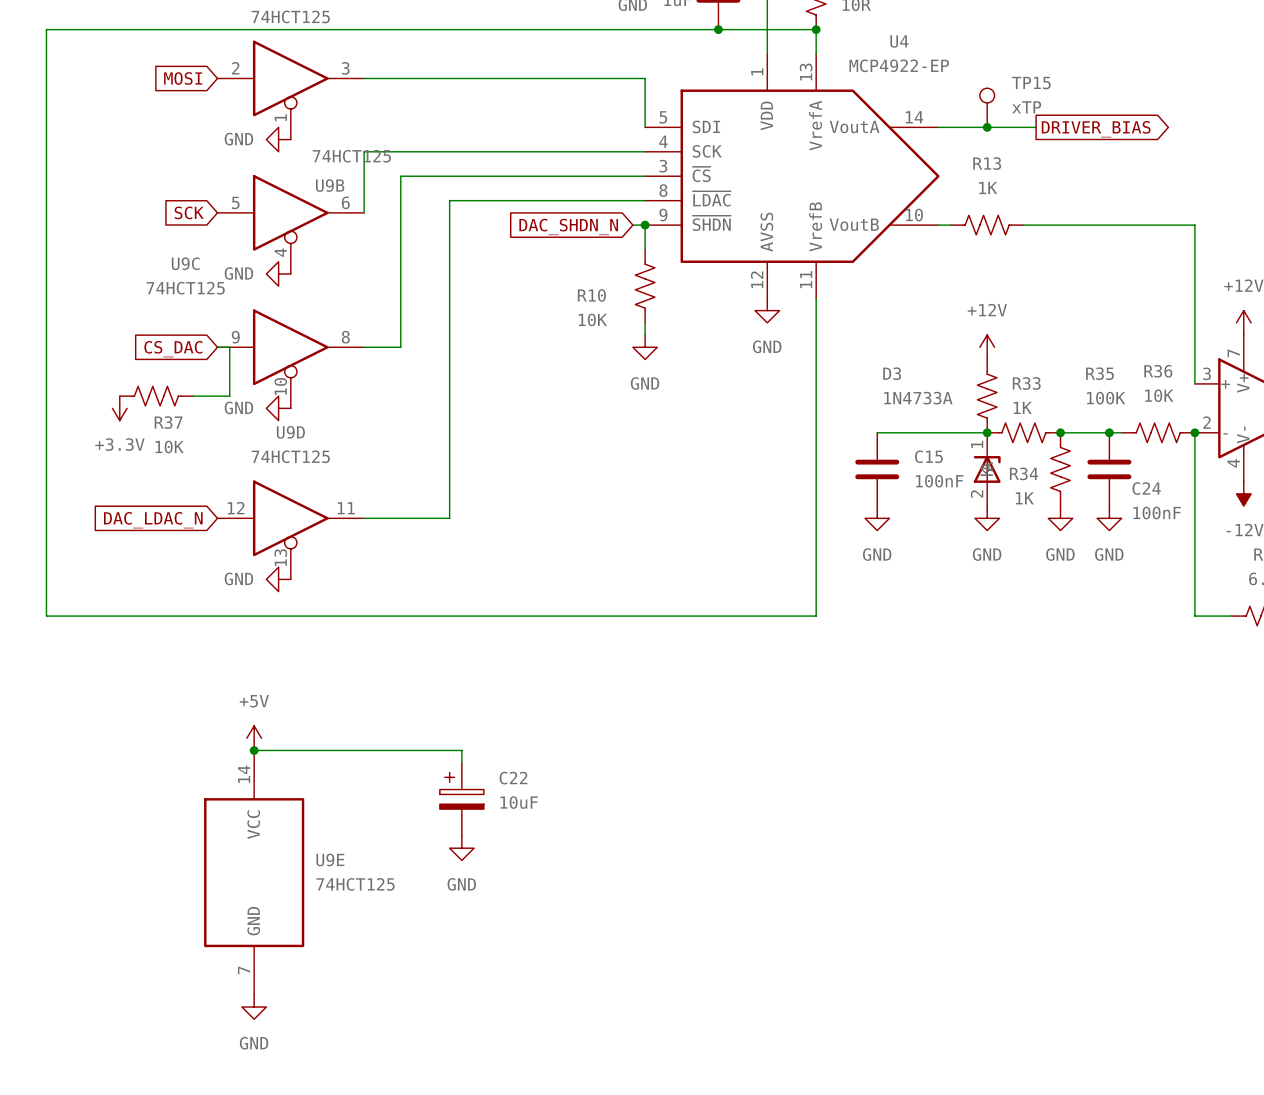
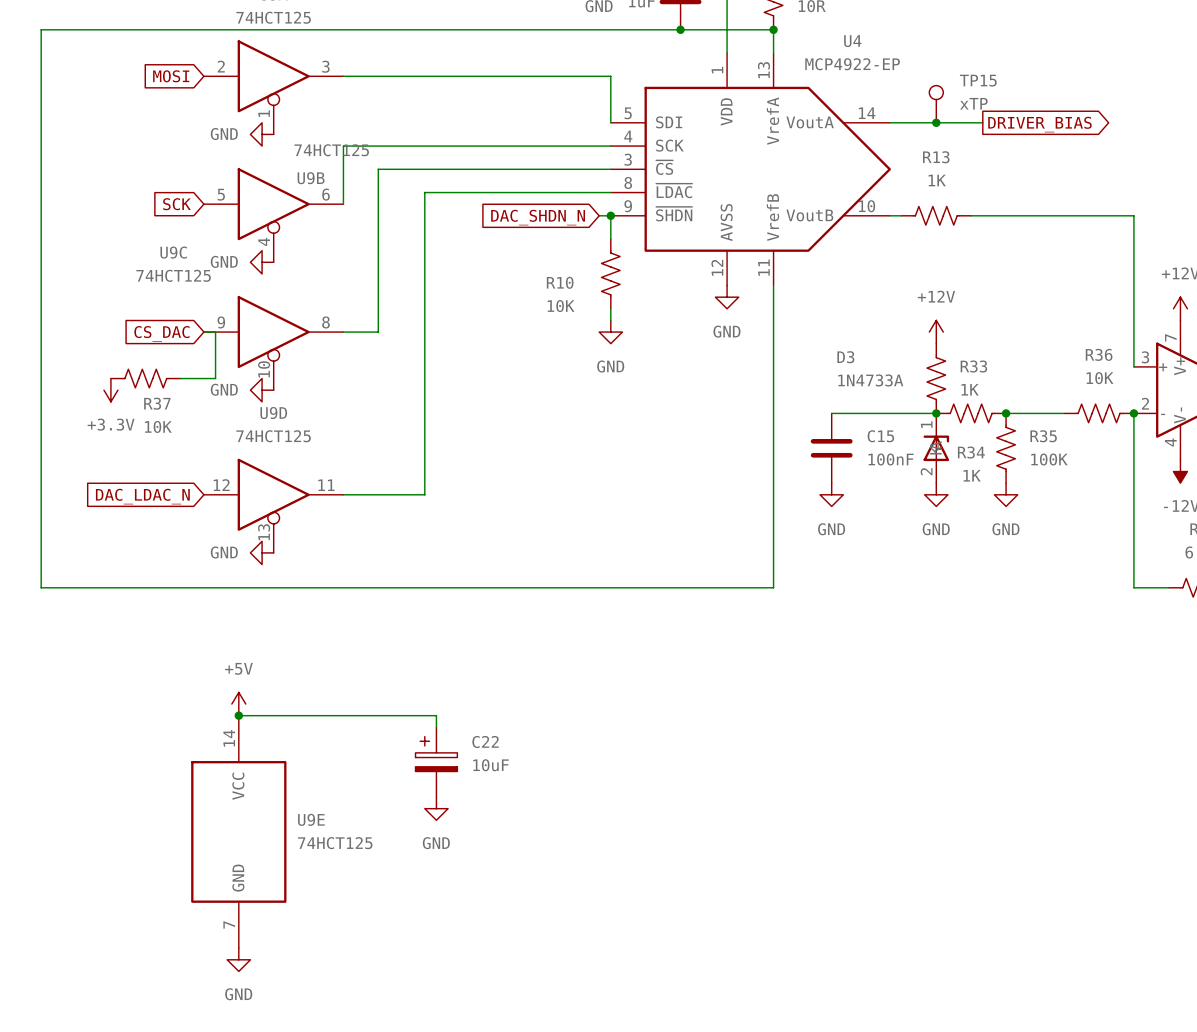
R35 name position: R35 (1100, 373) -> R35 (1043, 436)
R35 value position: 100K (1106, 398) -> 100K (1049, 459)
junction: (1109, 432) -> none
C24: 100nF (1109, 469) -> none
power symbol: GND (1109, 518) -> none

